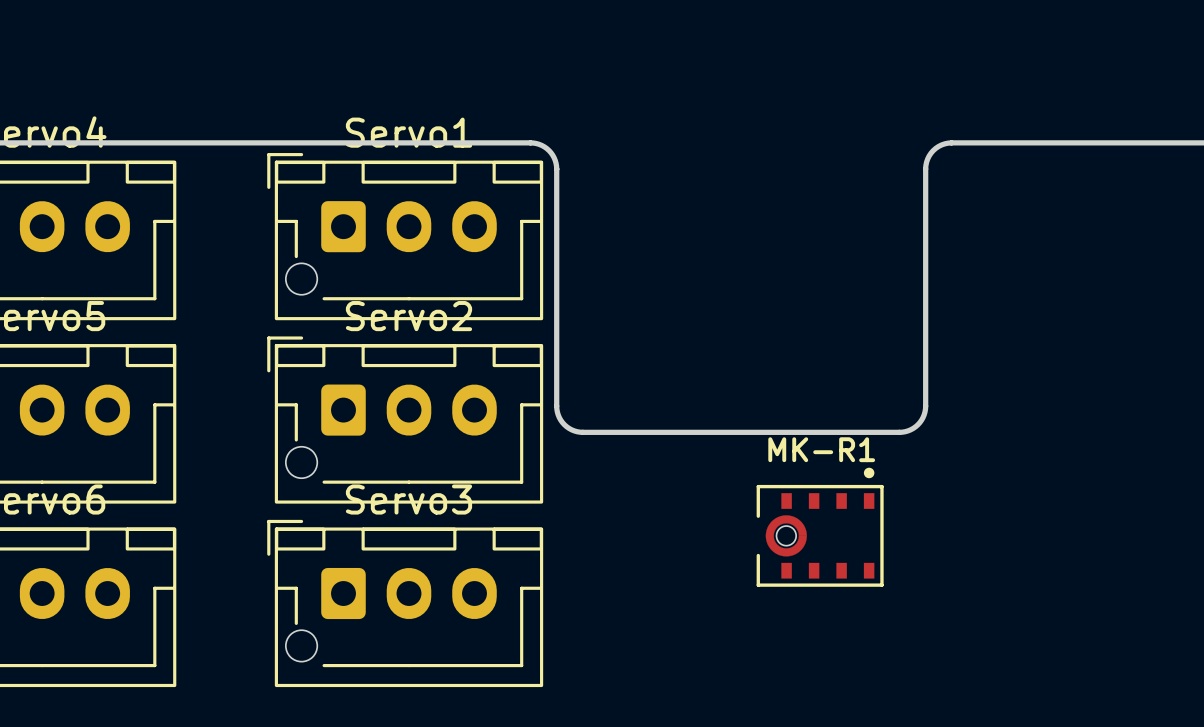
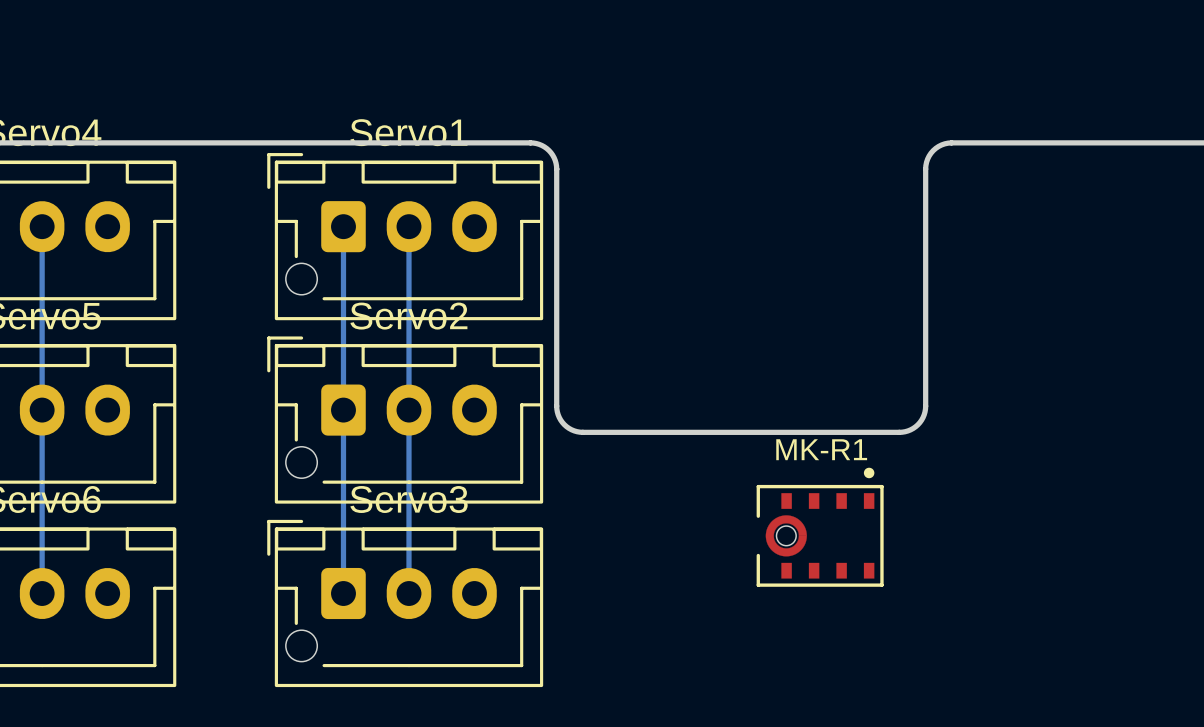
bottom track: none -> (42, 226) (42, 593)
bottom track: none -> (343, 226) (343, 593)
bottom track: none -> (408, 226) (408, 593)

